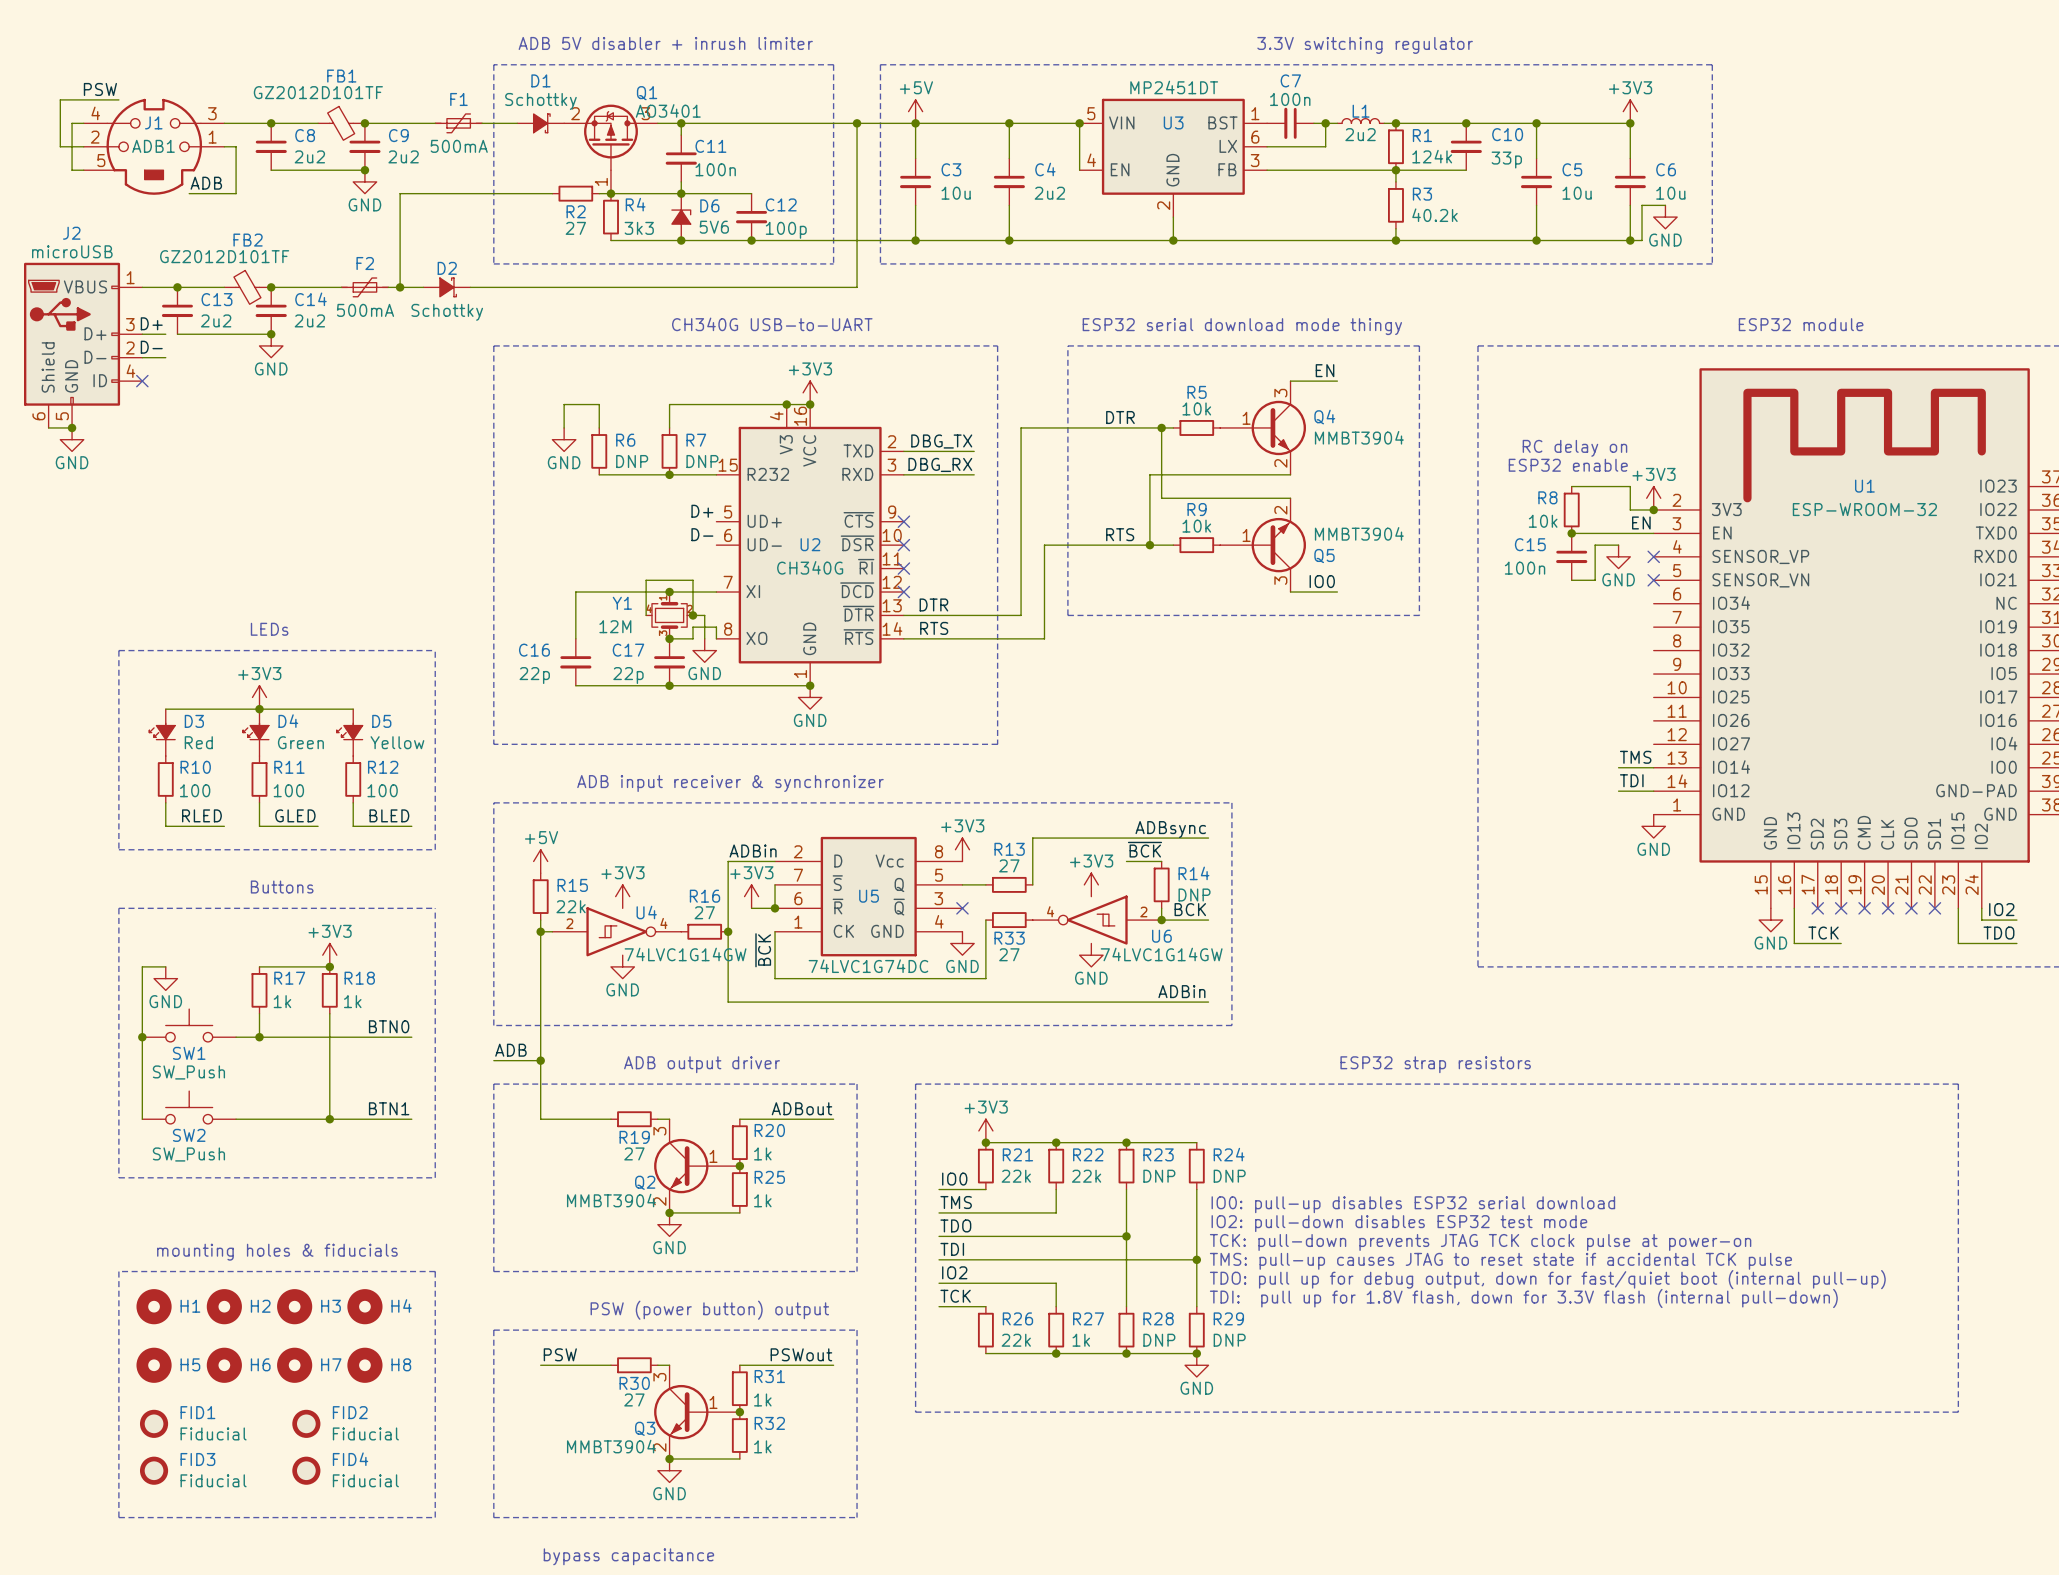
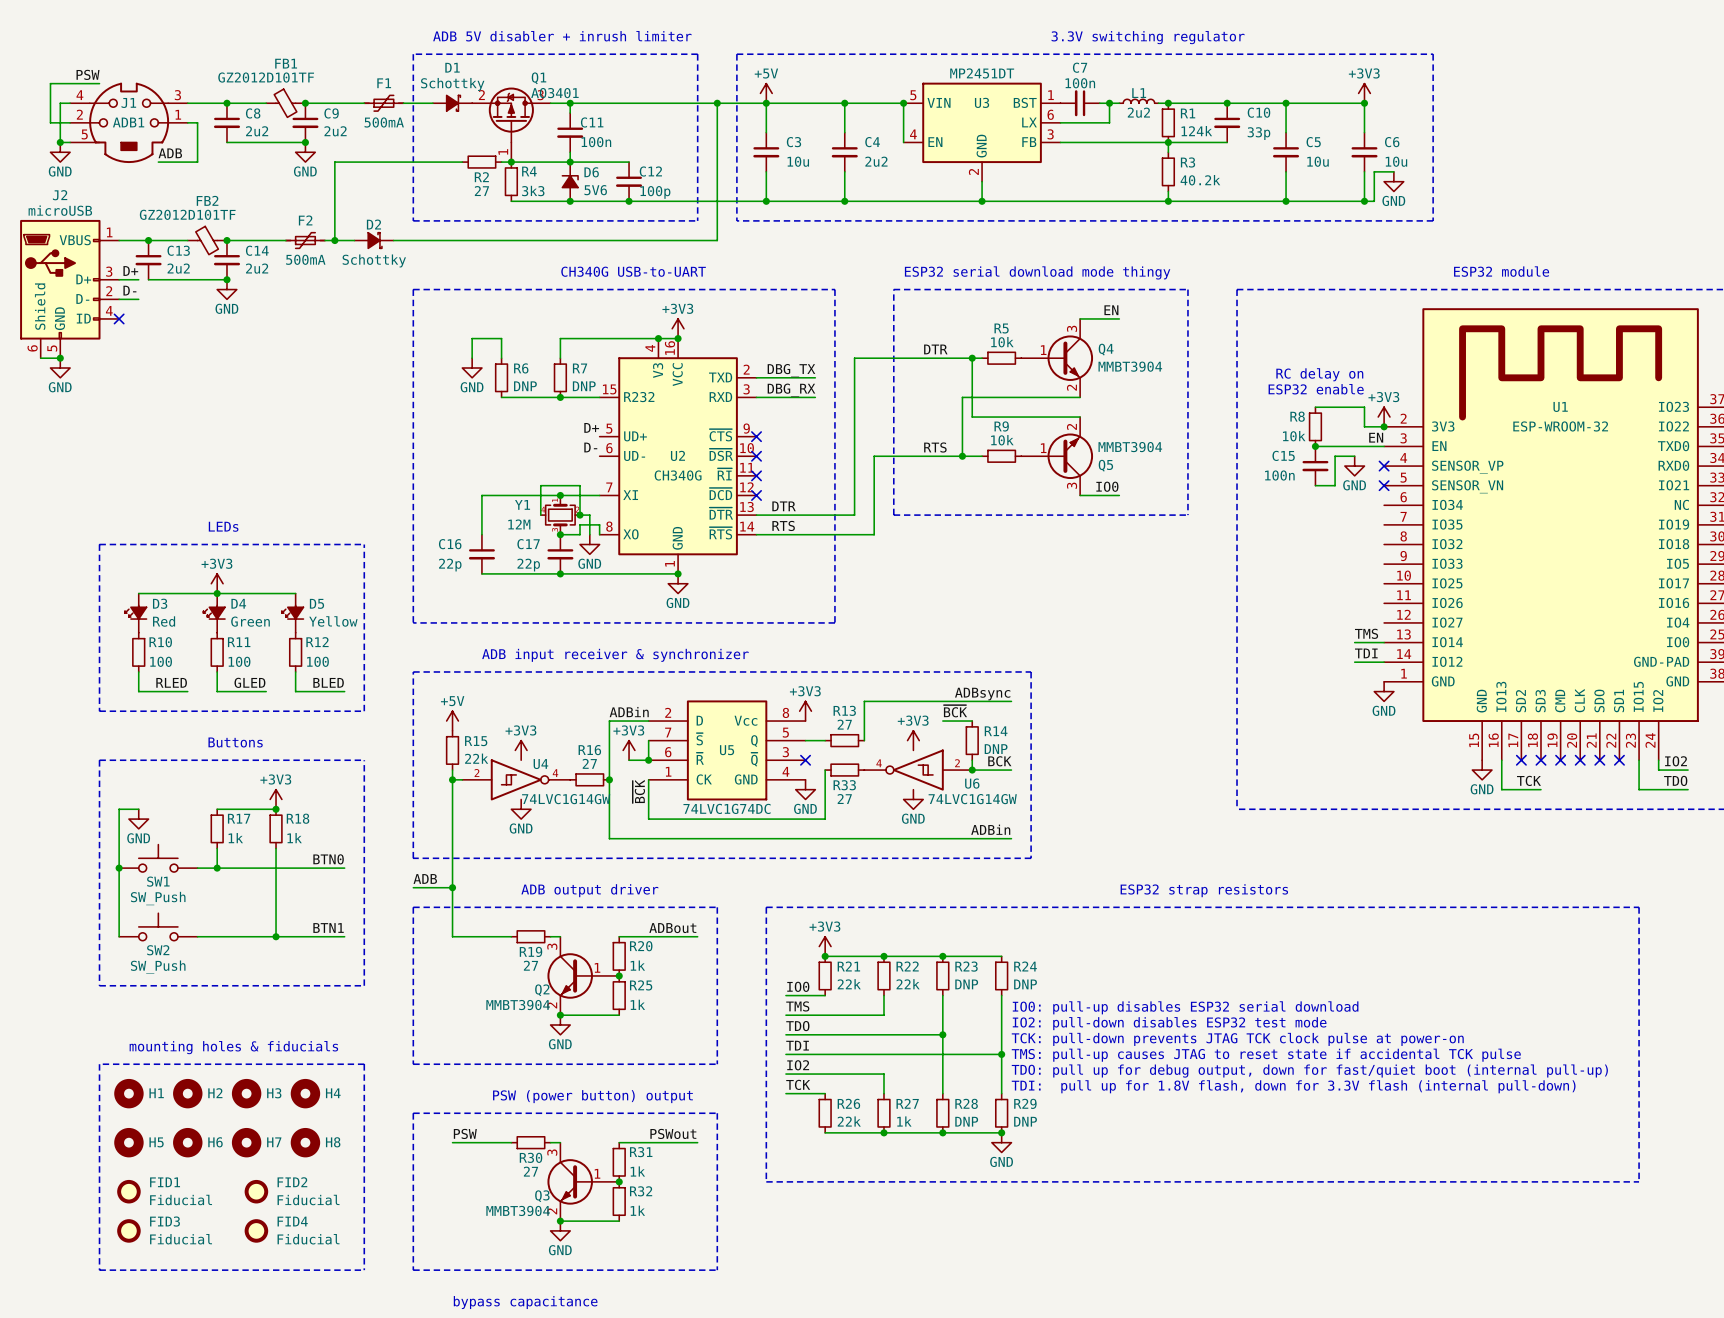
junction: none -> (60, 142)
power symbol: none -> GND (60, 152)

